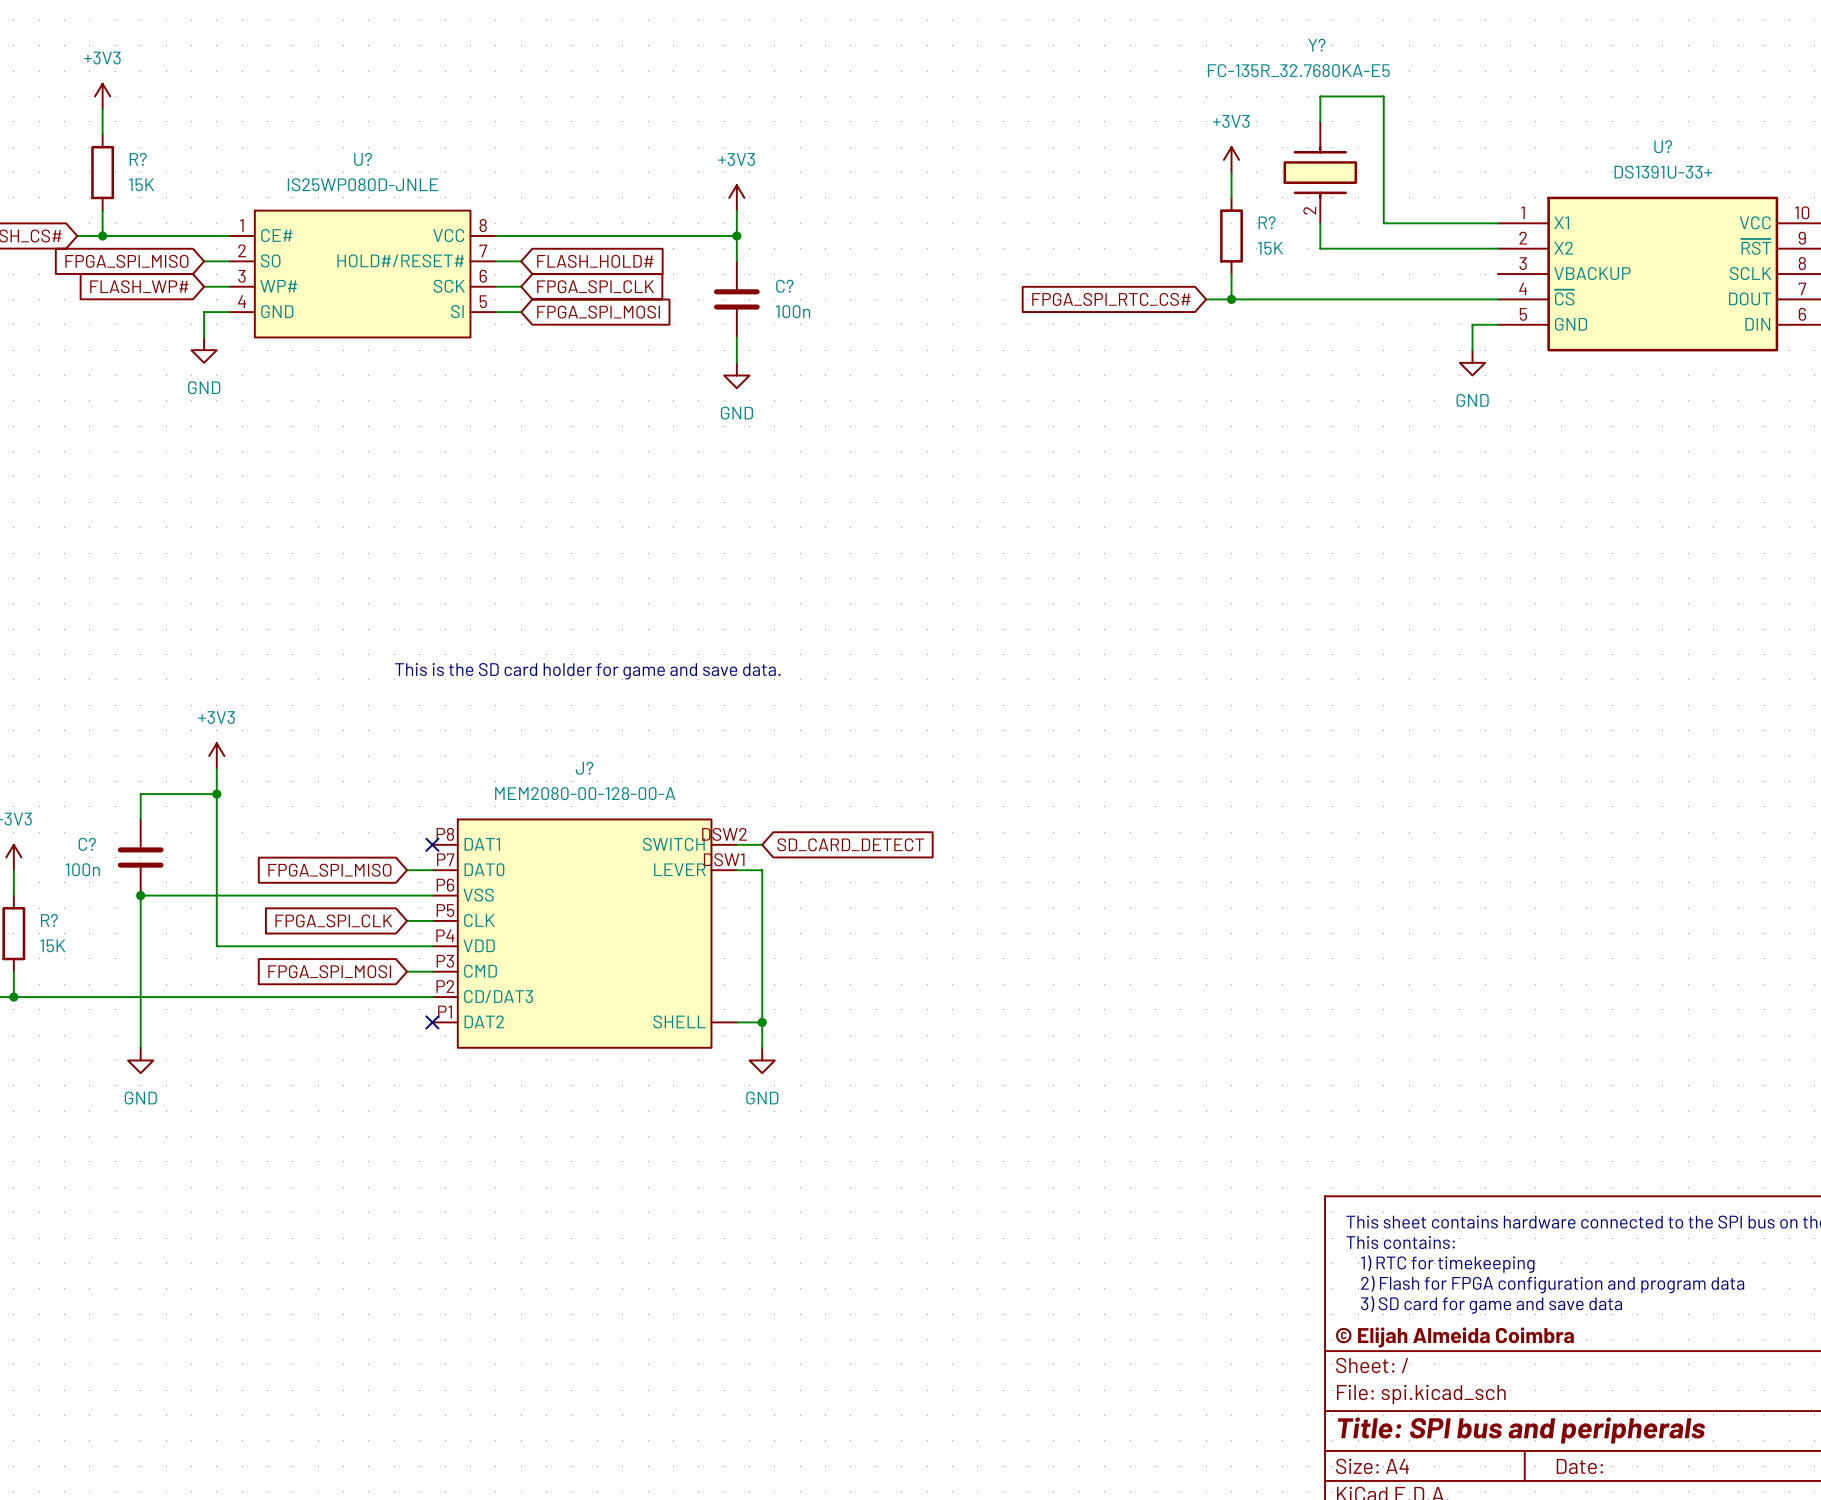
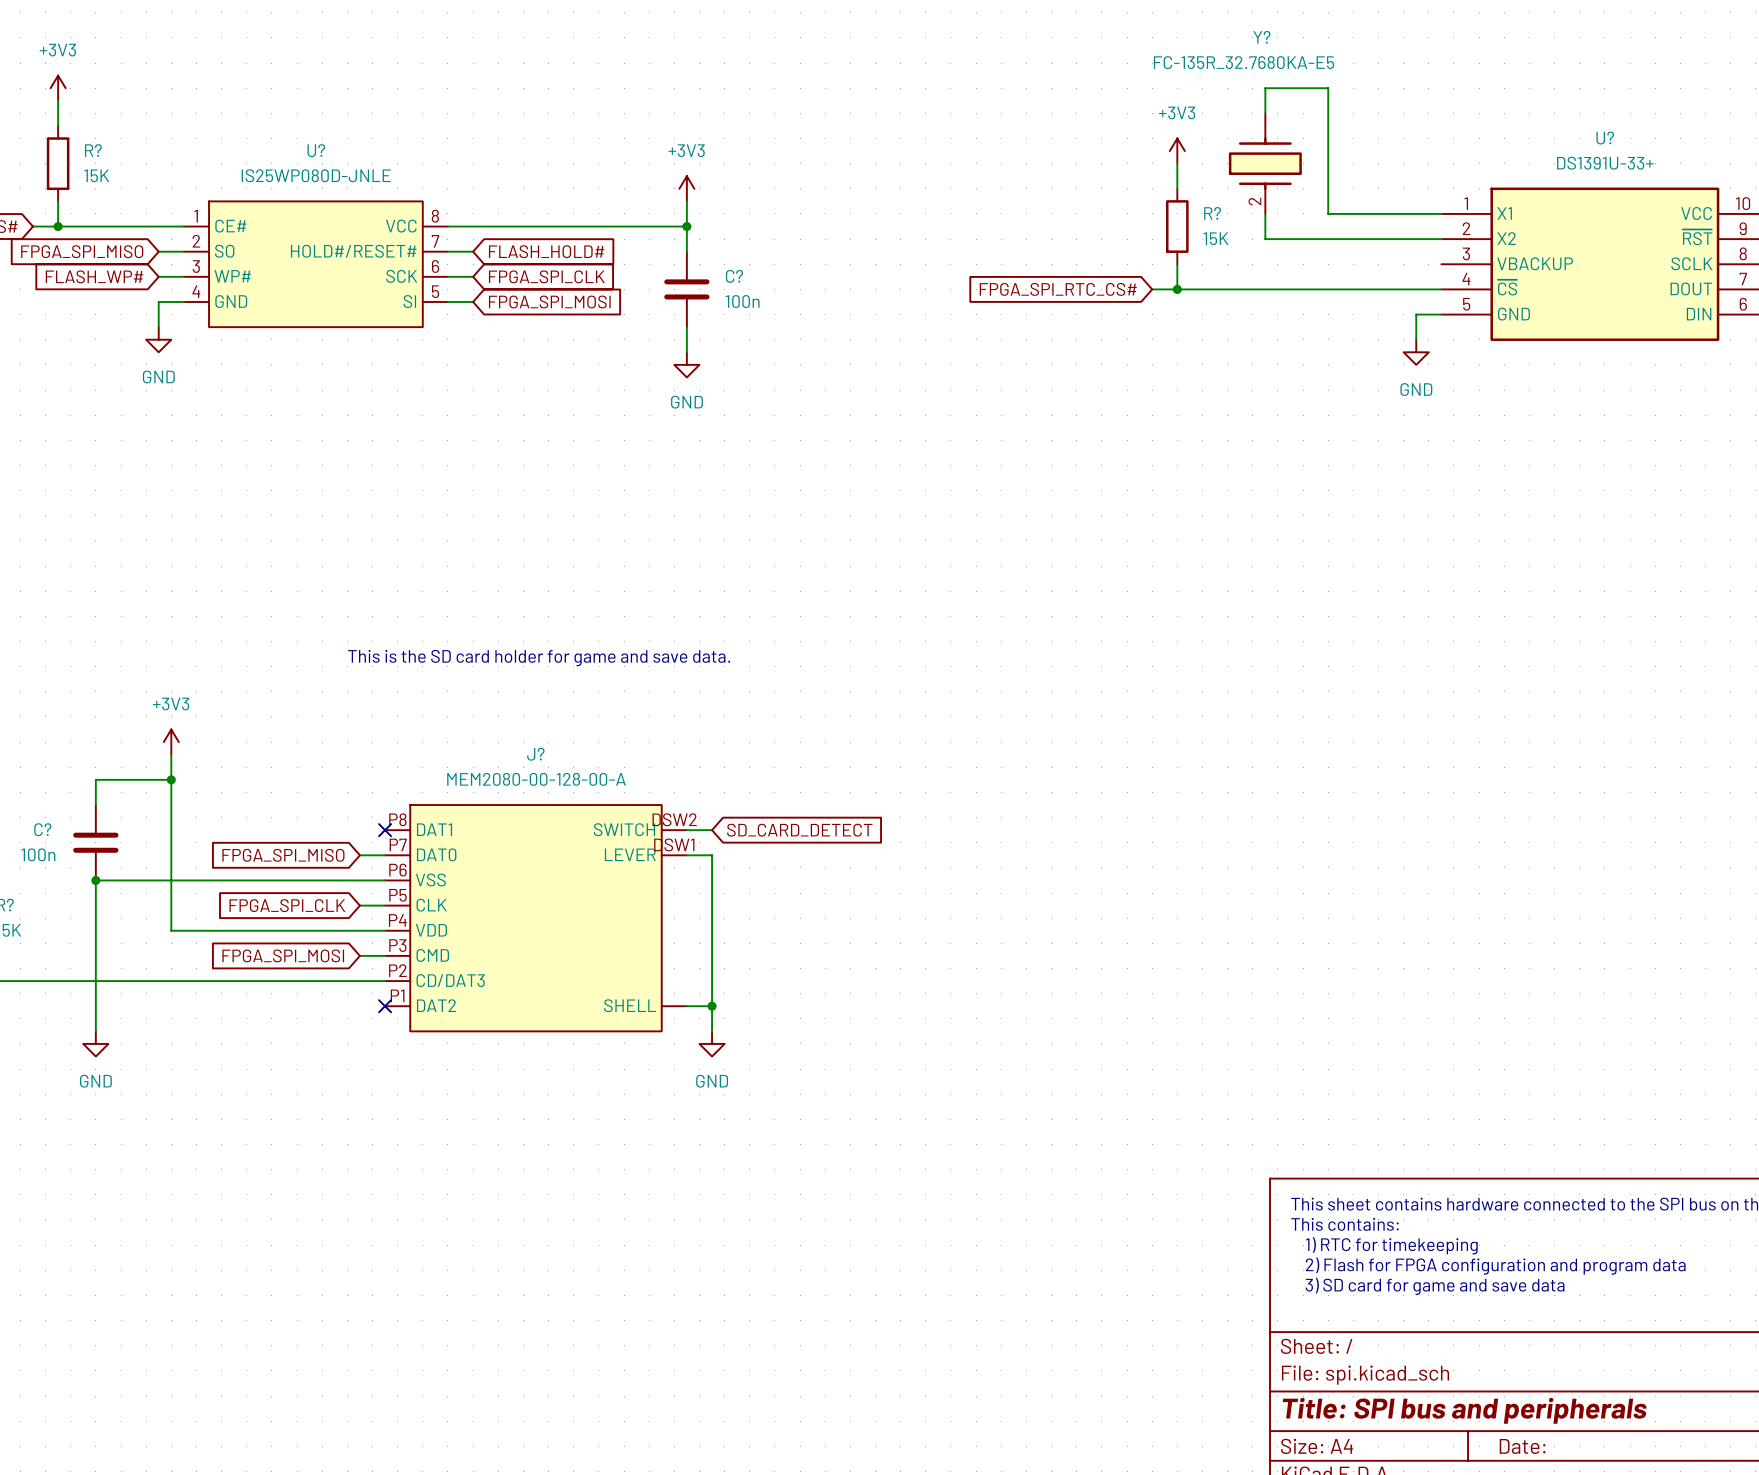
title block: © Elijah Almeida Coimbra (1454, 1337) -> none

